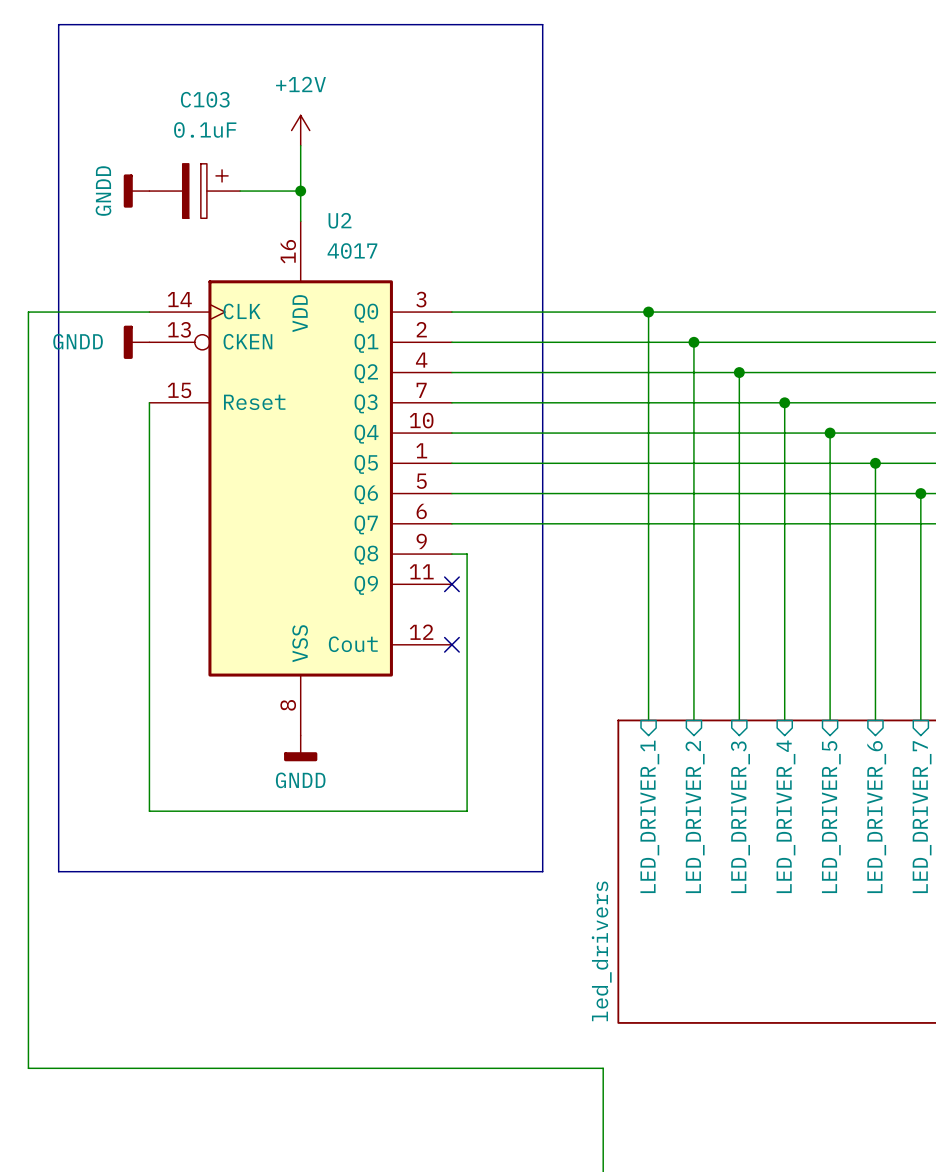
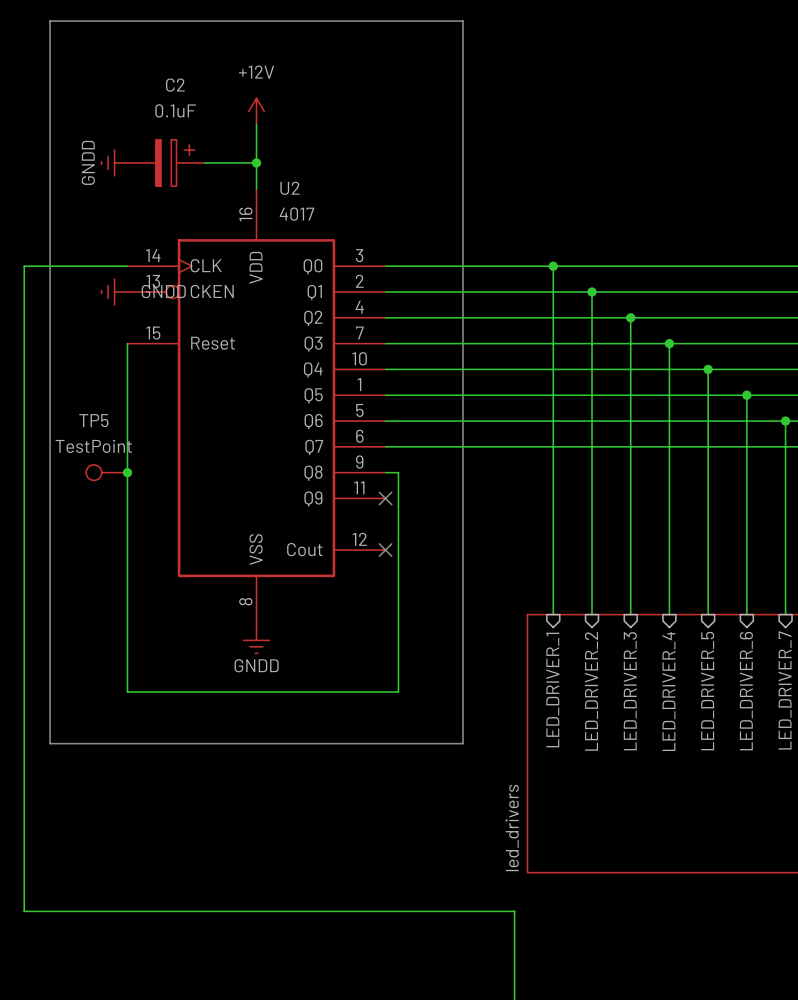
C103 name: C103 (205, 99) -> C2 (175, 85)
power symbol shape: [123, 174, 150, 208] -> [101, 150, 128, 176]
power symbol shape: [123, 325, 150, 359] -> [101, 279, 128, 305]
power symbol text position: GNDD (78, 341) -> GNDD (163, 291)
TP5: none -> TestPoint (106, 472)
junction: none -> (127, 472)
power symbol shape: [284, 735, 318, 762] -> [243, 627, 270, 654]

